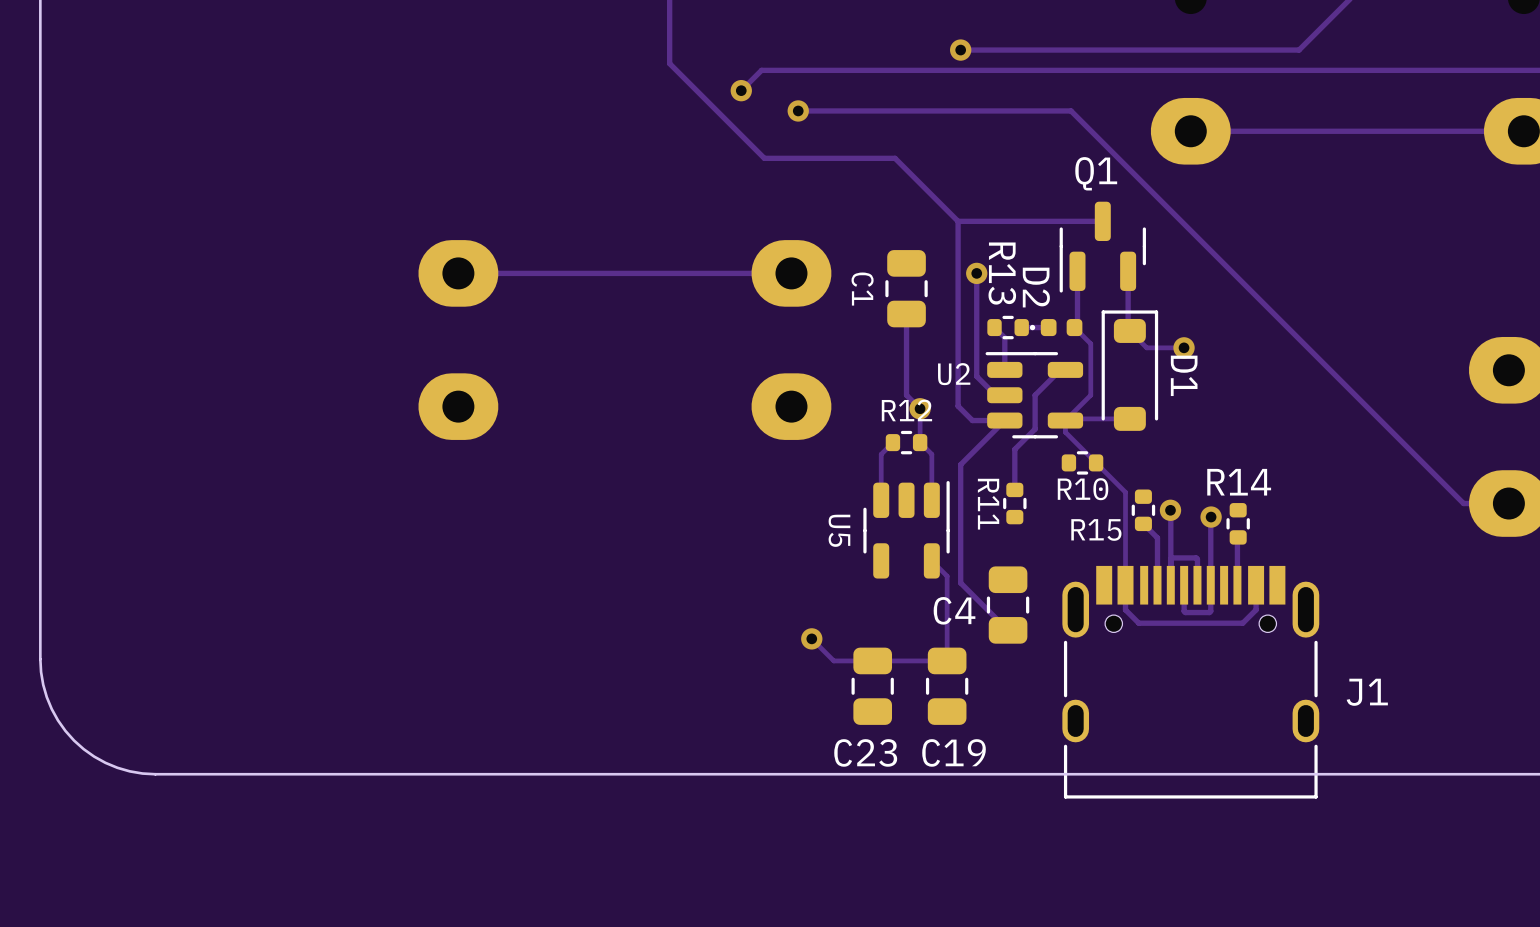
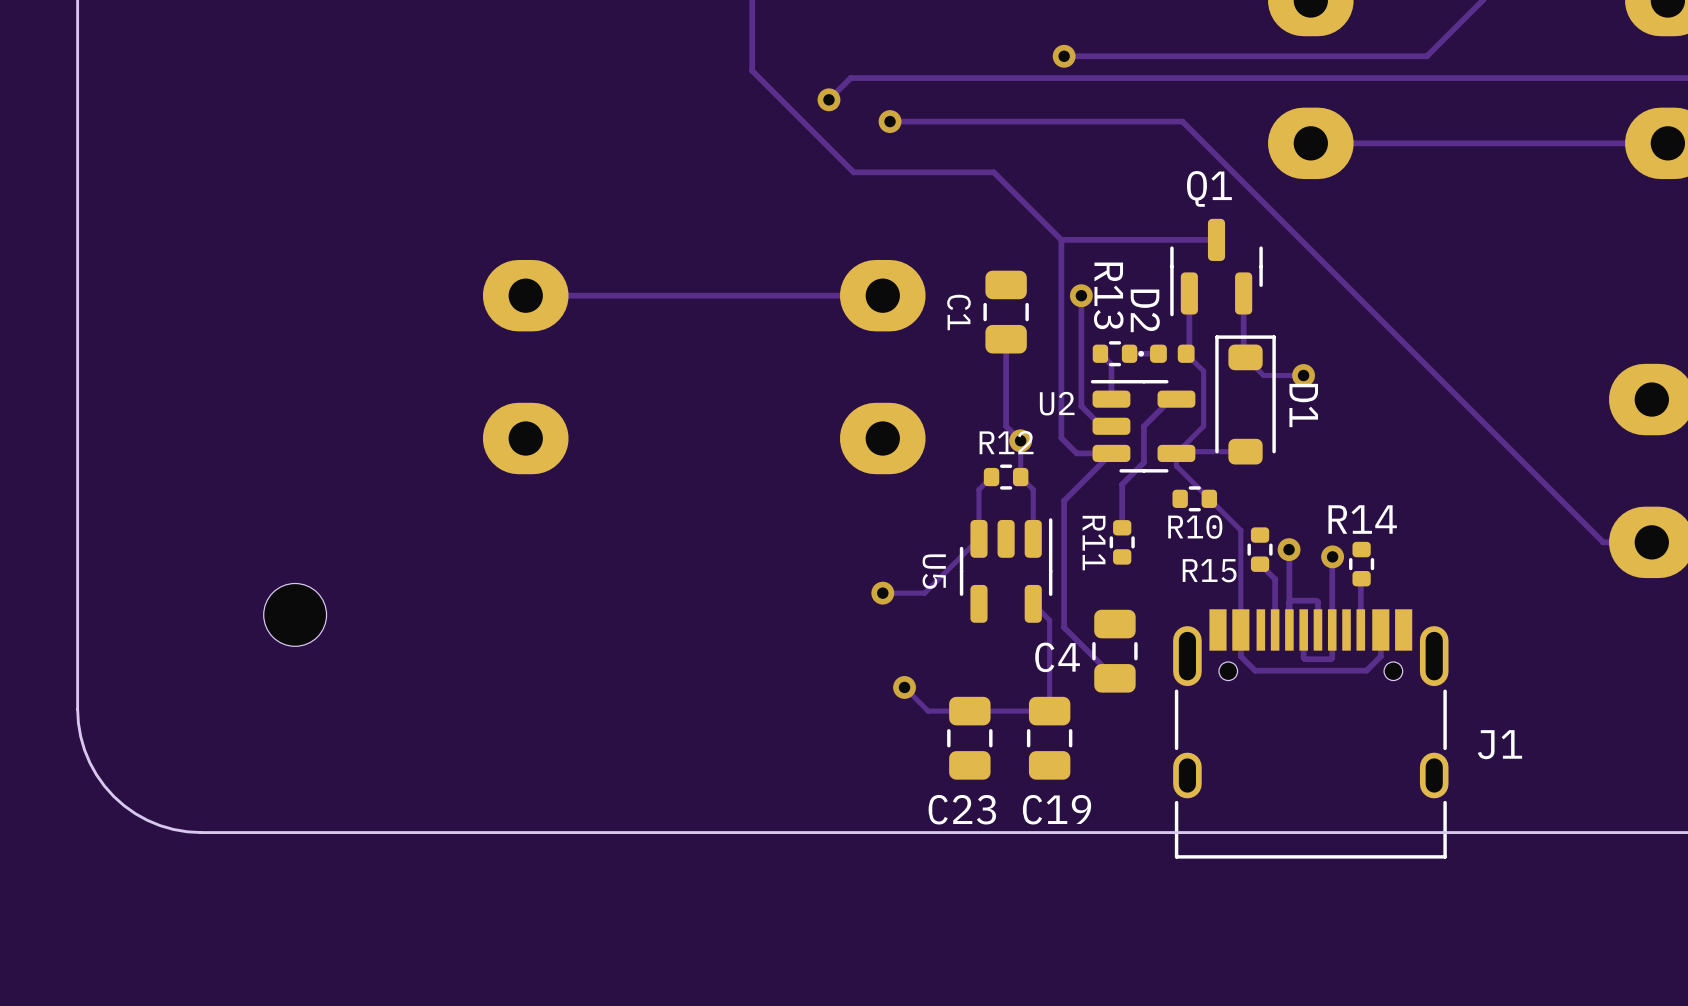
track: none -> (978, 538) (924, 593) (882, 593)
via: none -> (882, 593)
part: none -> (295, 614)

